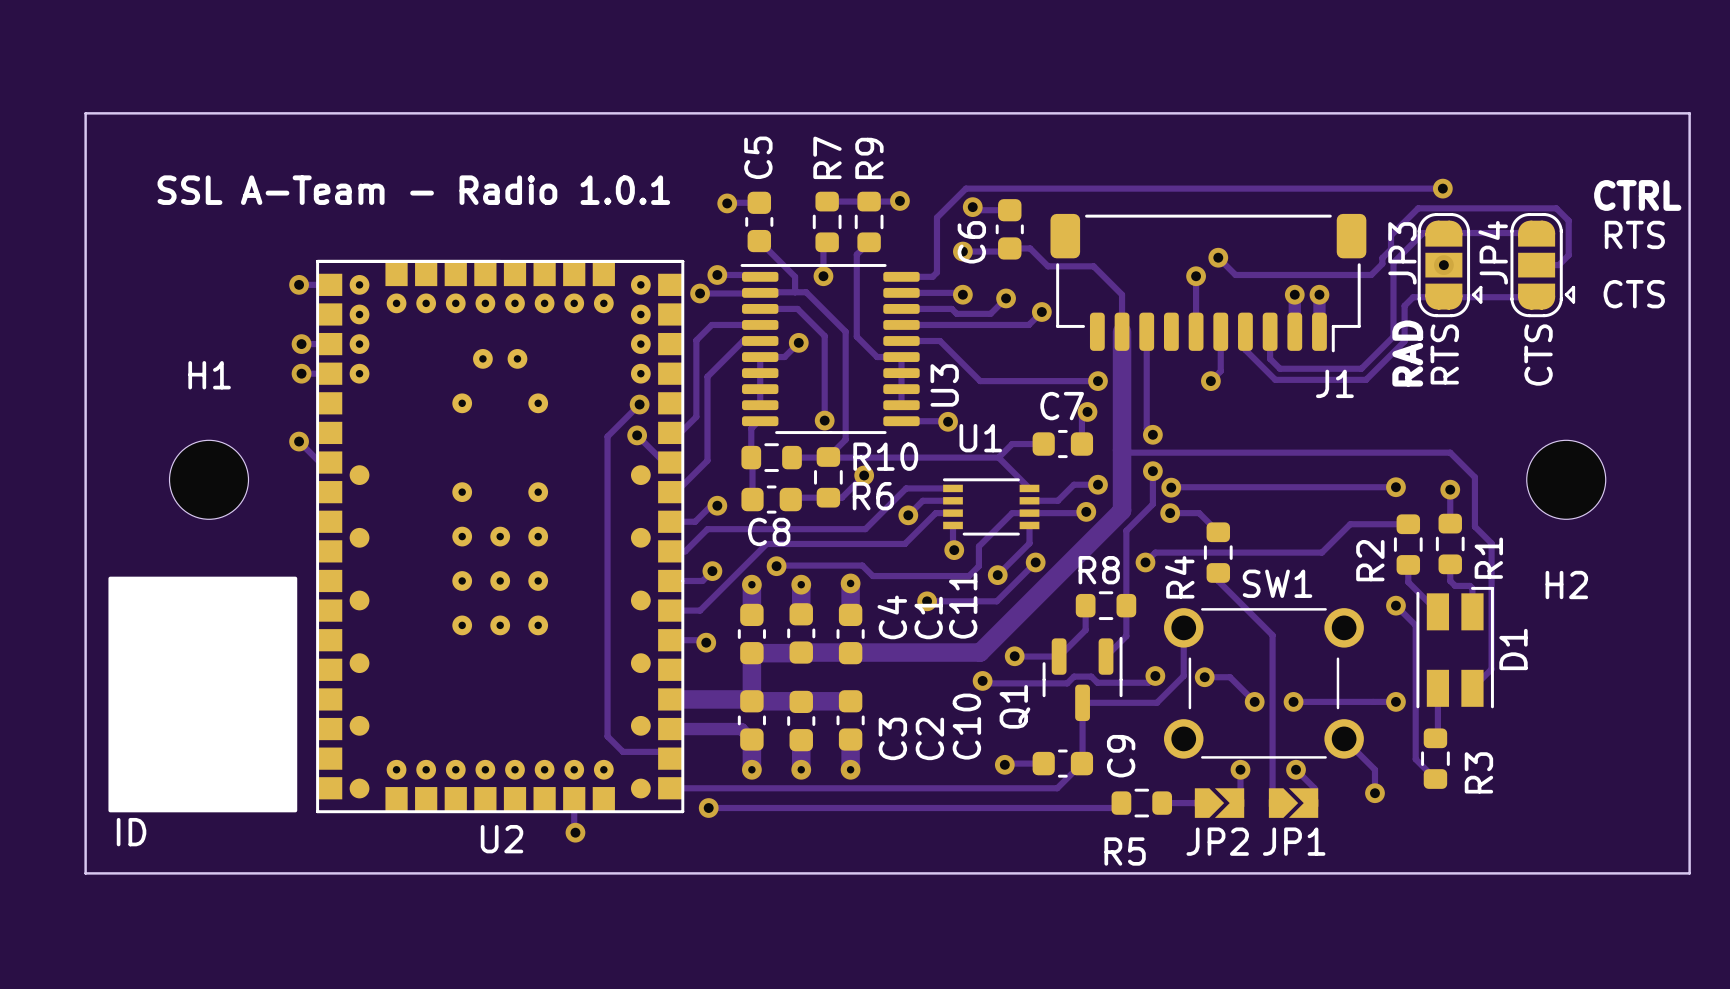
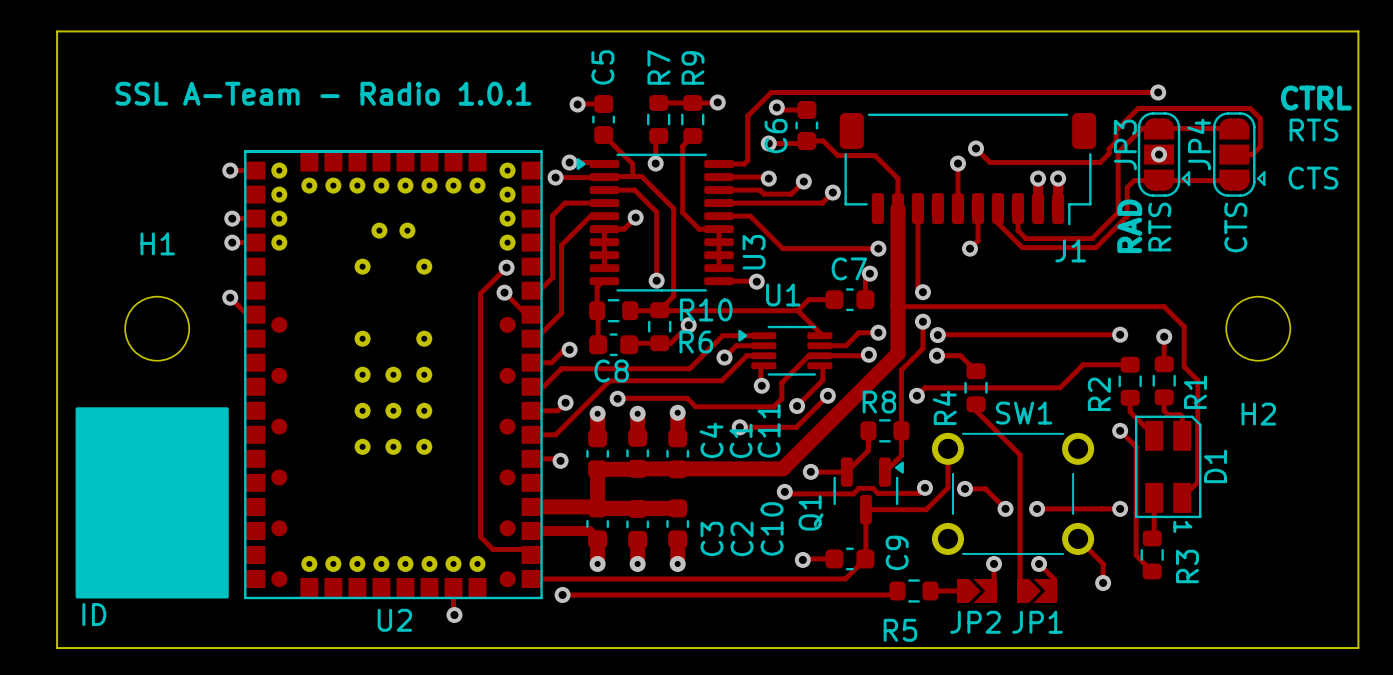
U3 footprint: [740, 264, 920, 435] -> [576, 153, 734, 292]
U1 footprint: [942, 478, 1040, 536] -> [738, 325, 833, 376]
D1 footprint: [1416, 586, 1494, 709] -> [1134, 415, 1202, 519]
Q1 footprint: [1042, 636, 1123, 722] -> [833, 457, 904, 525]

